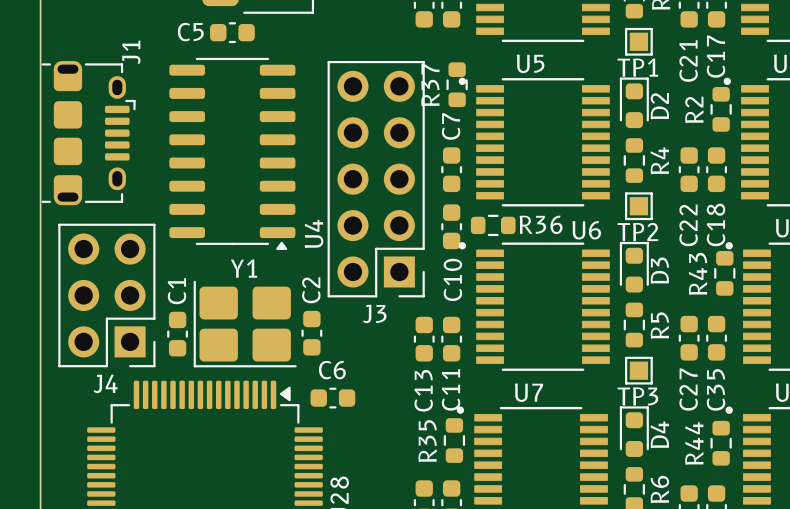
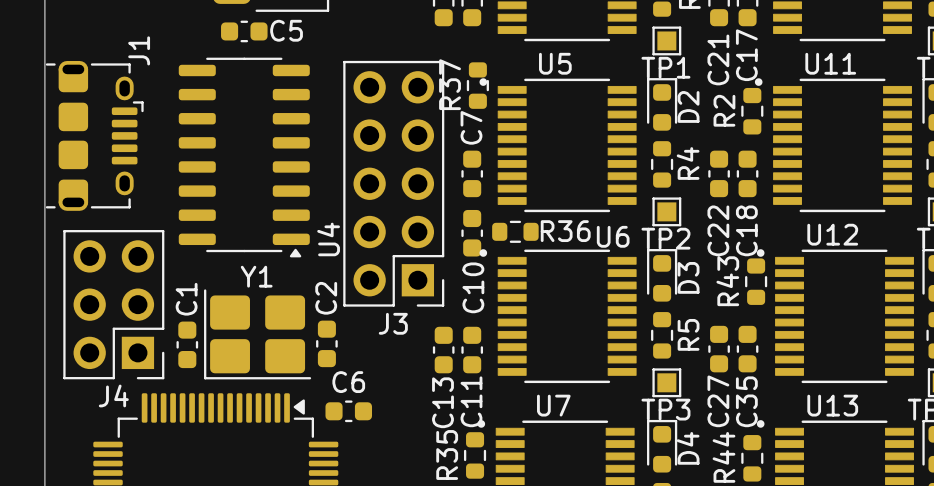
C5 name position: C5 (190, 32) -> C5 (286, 30)

